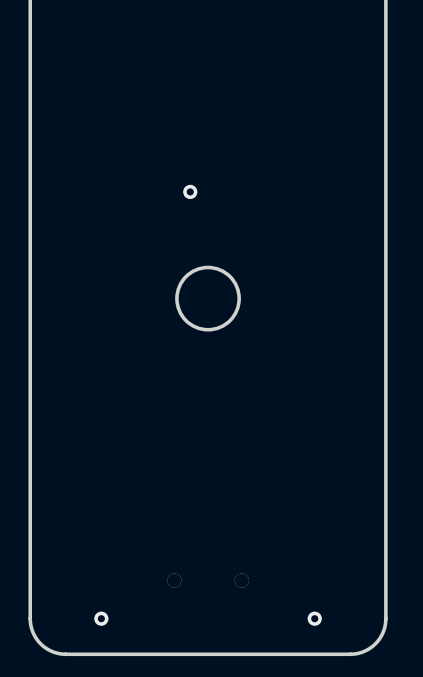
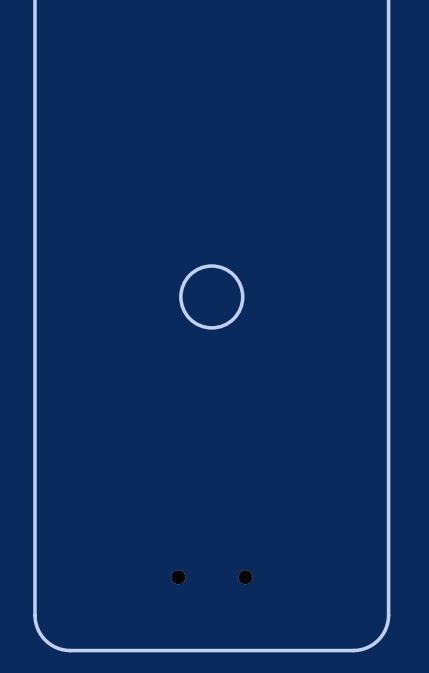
via: (190, 191) -> none
via: (101, 618) -> none
via: (314, 618) -> none

